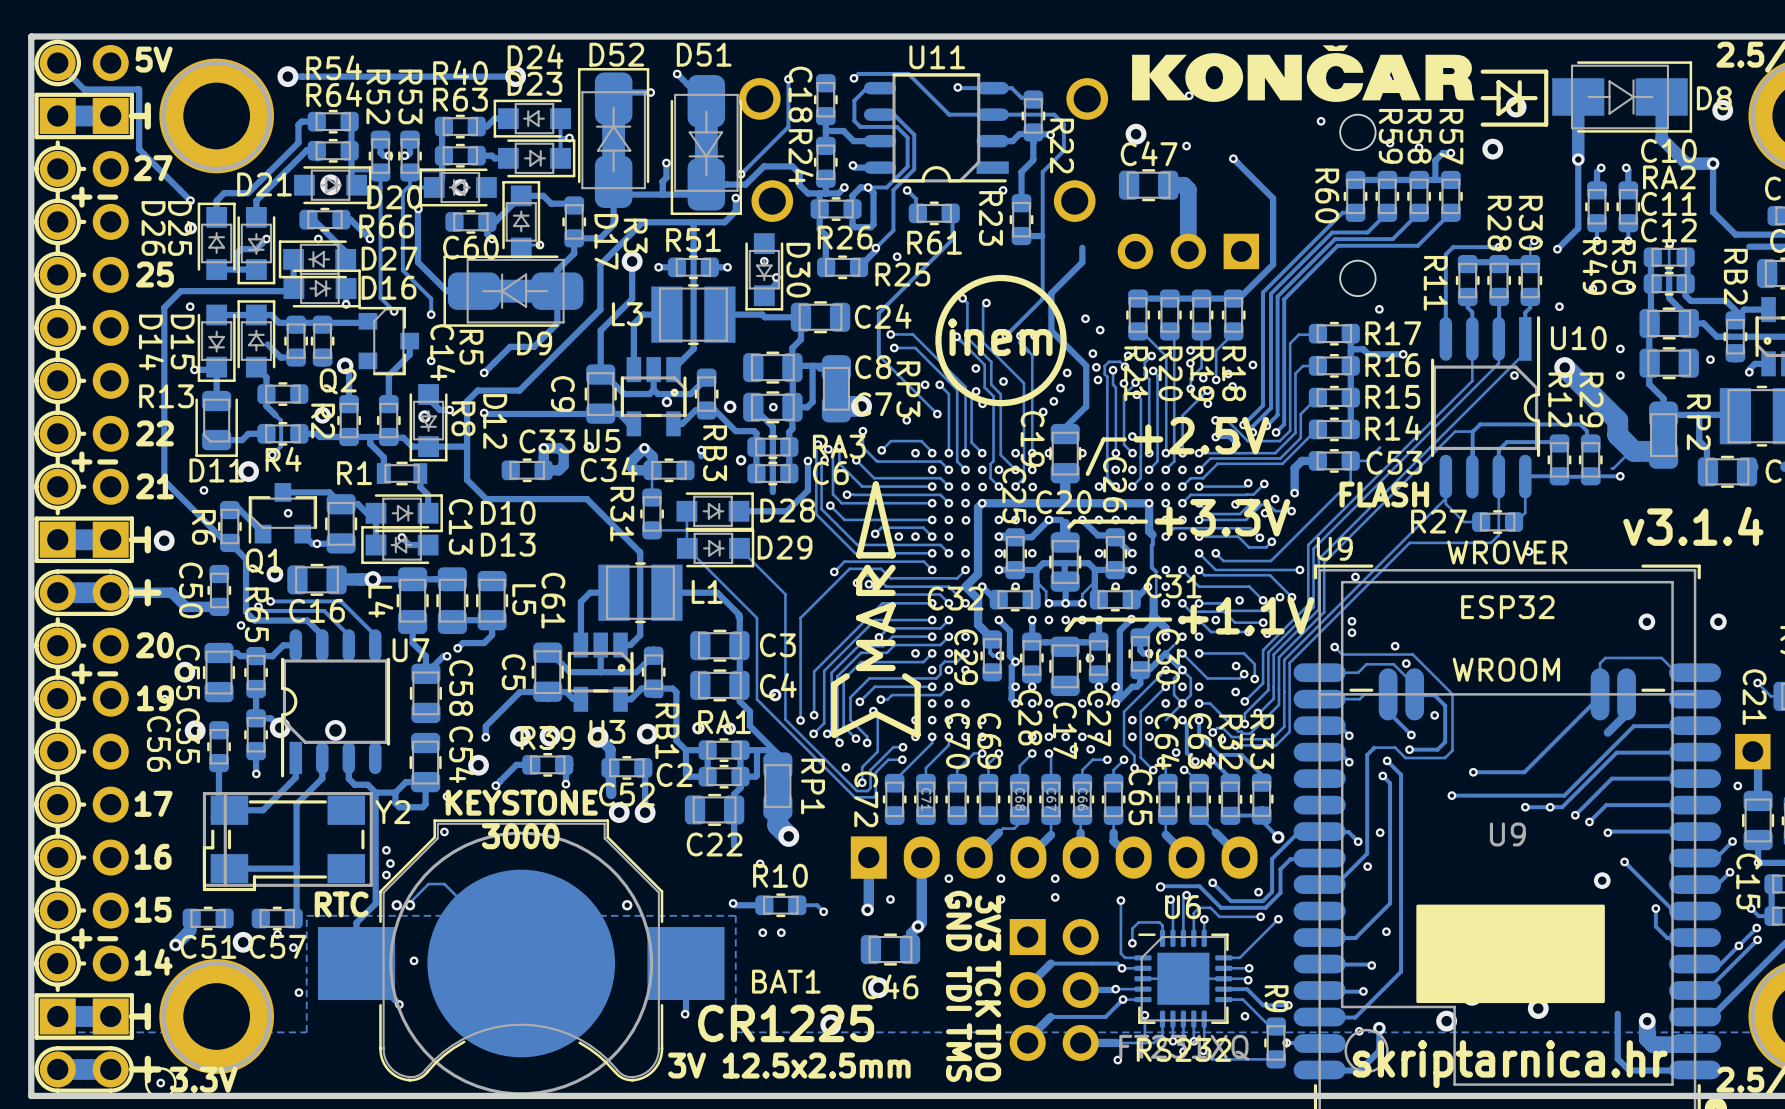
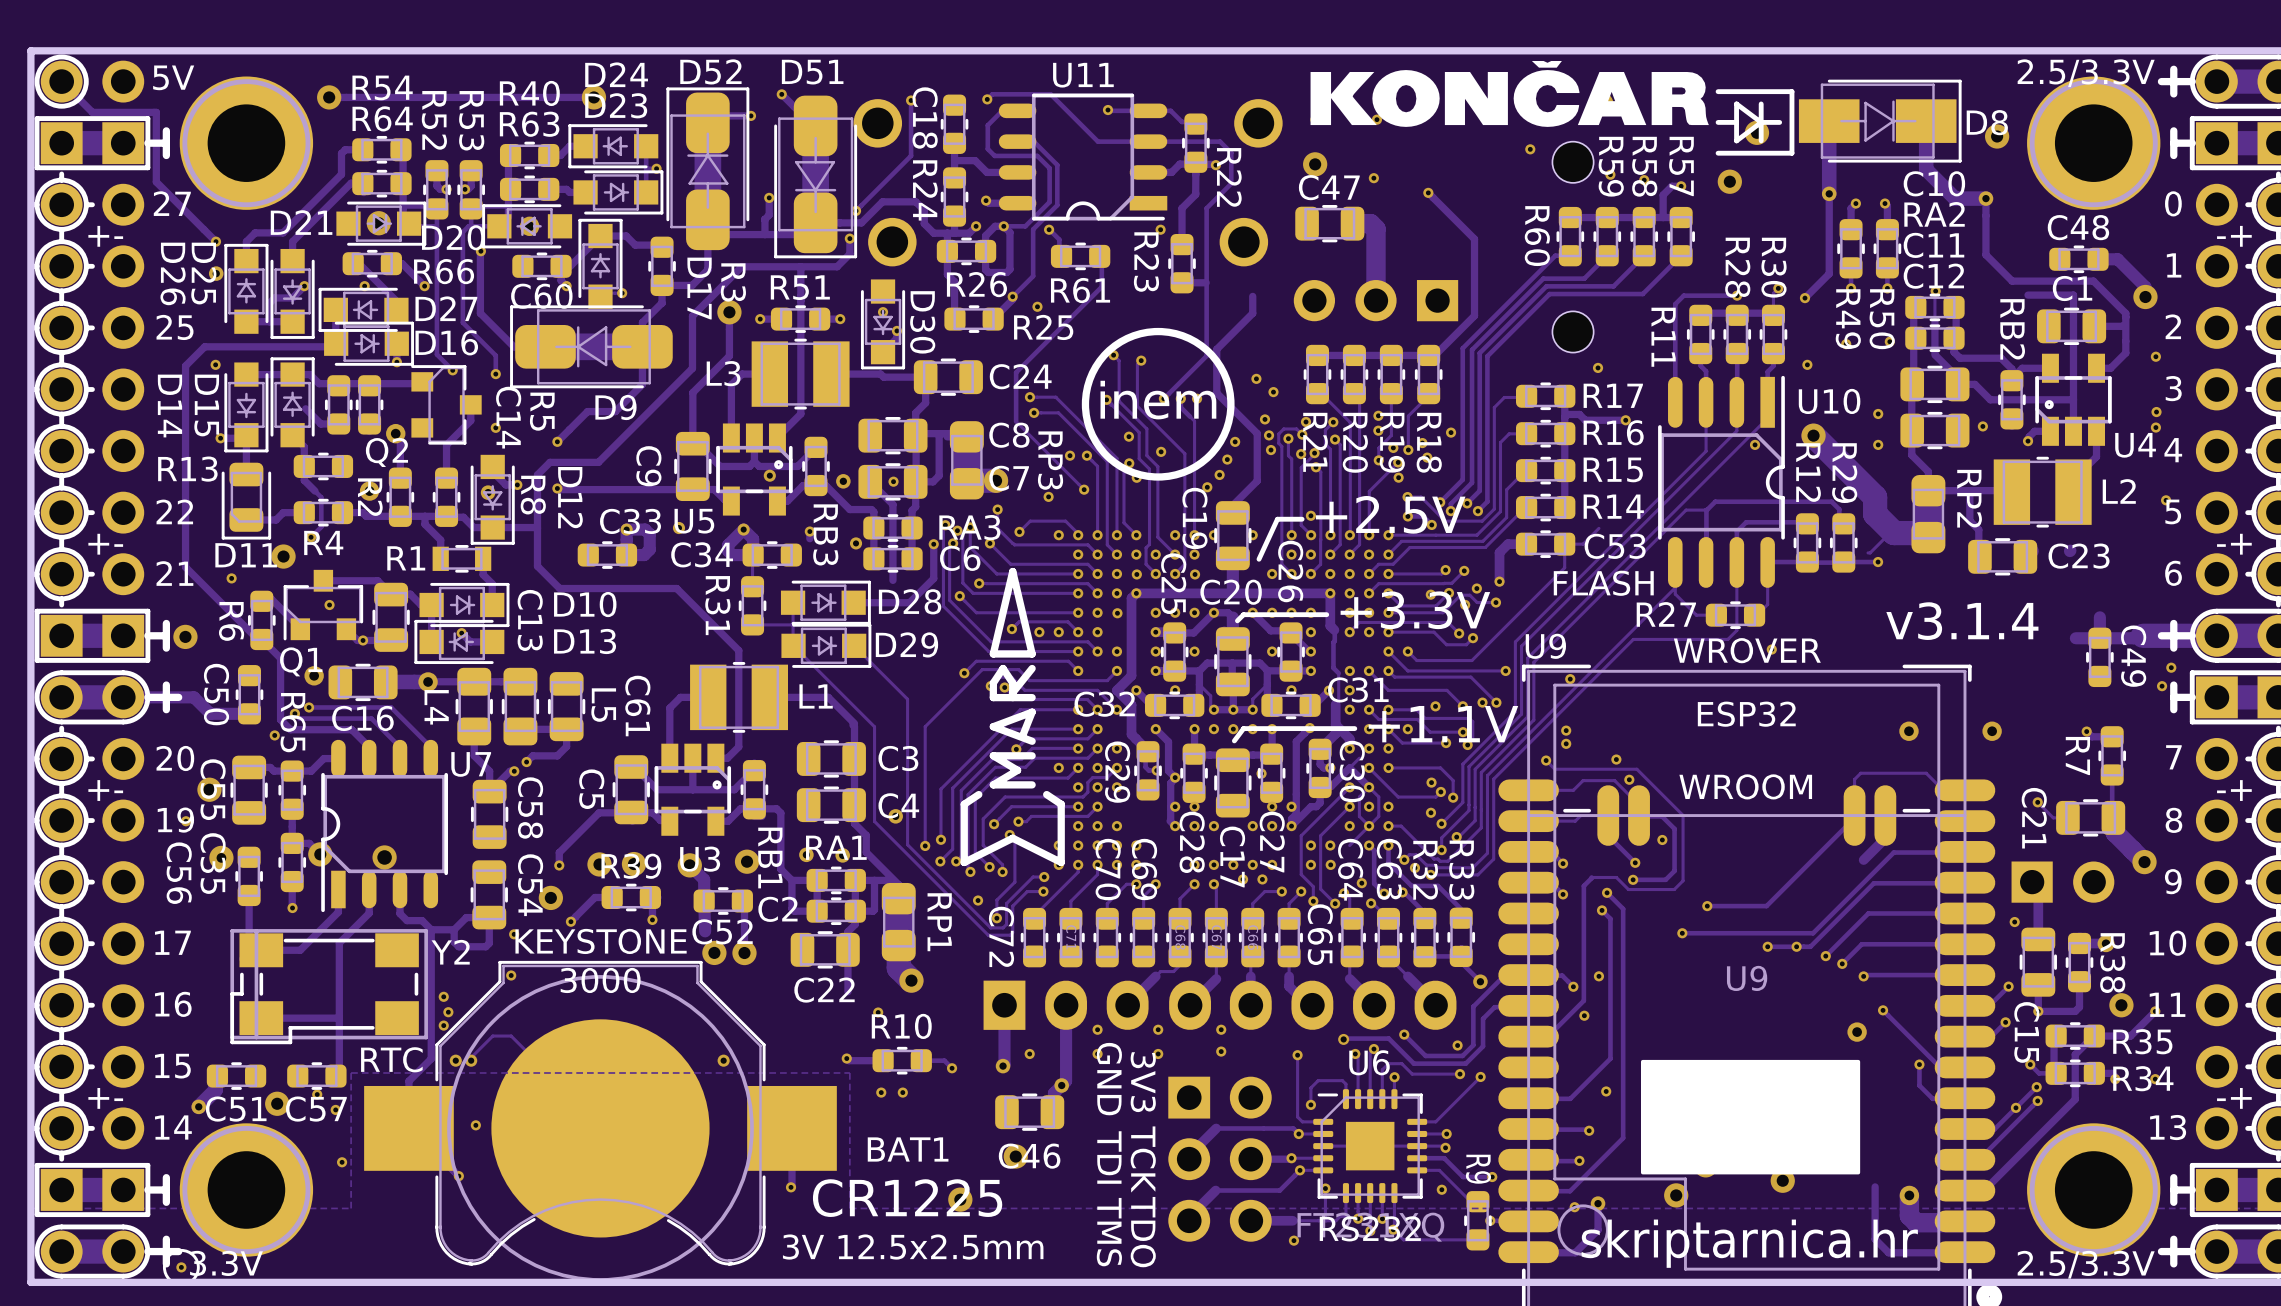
U6 footprint: [1134, 929, 1233, 1028] -> [1313, 1089, 1428, 1204]

